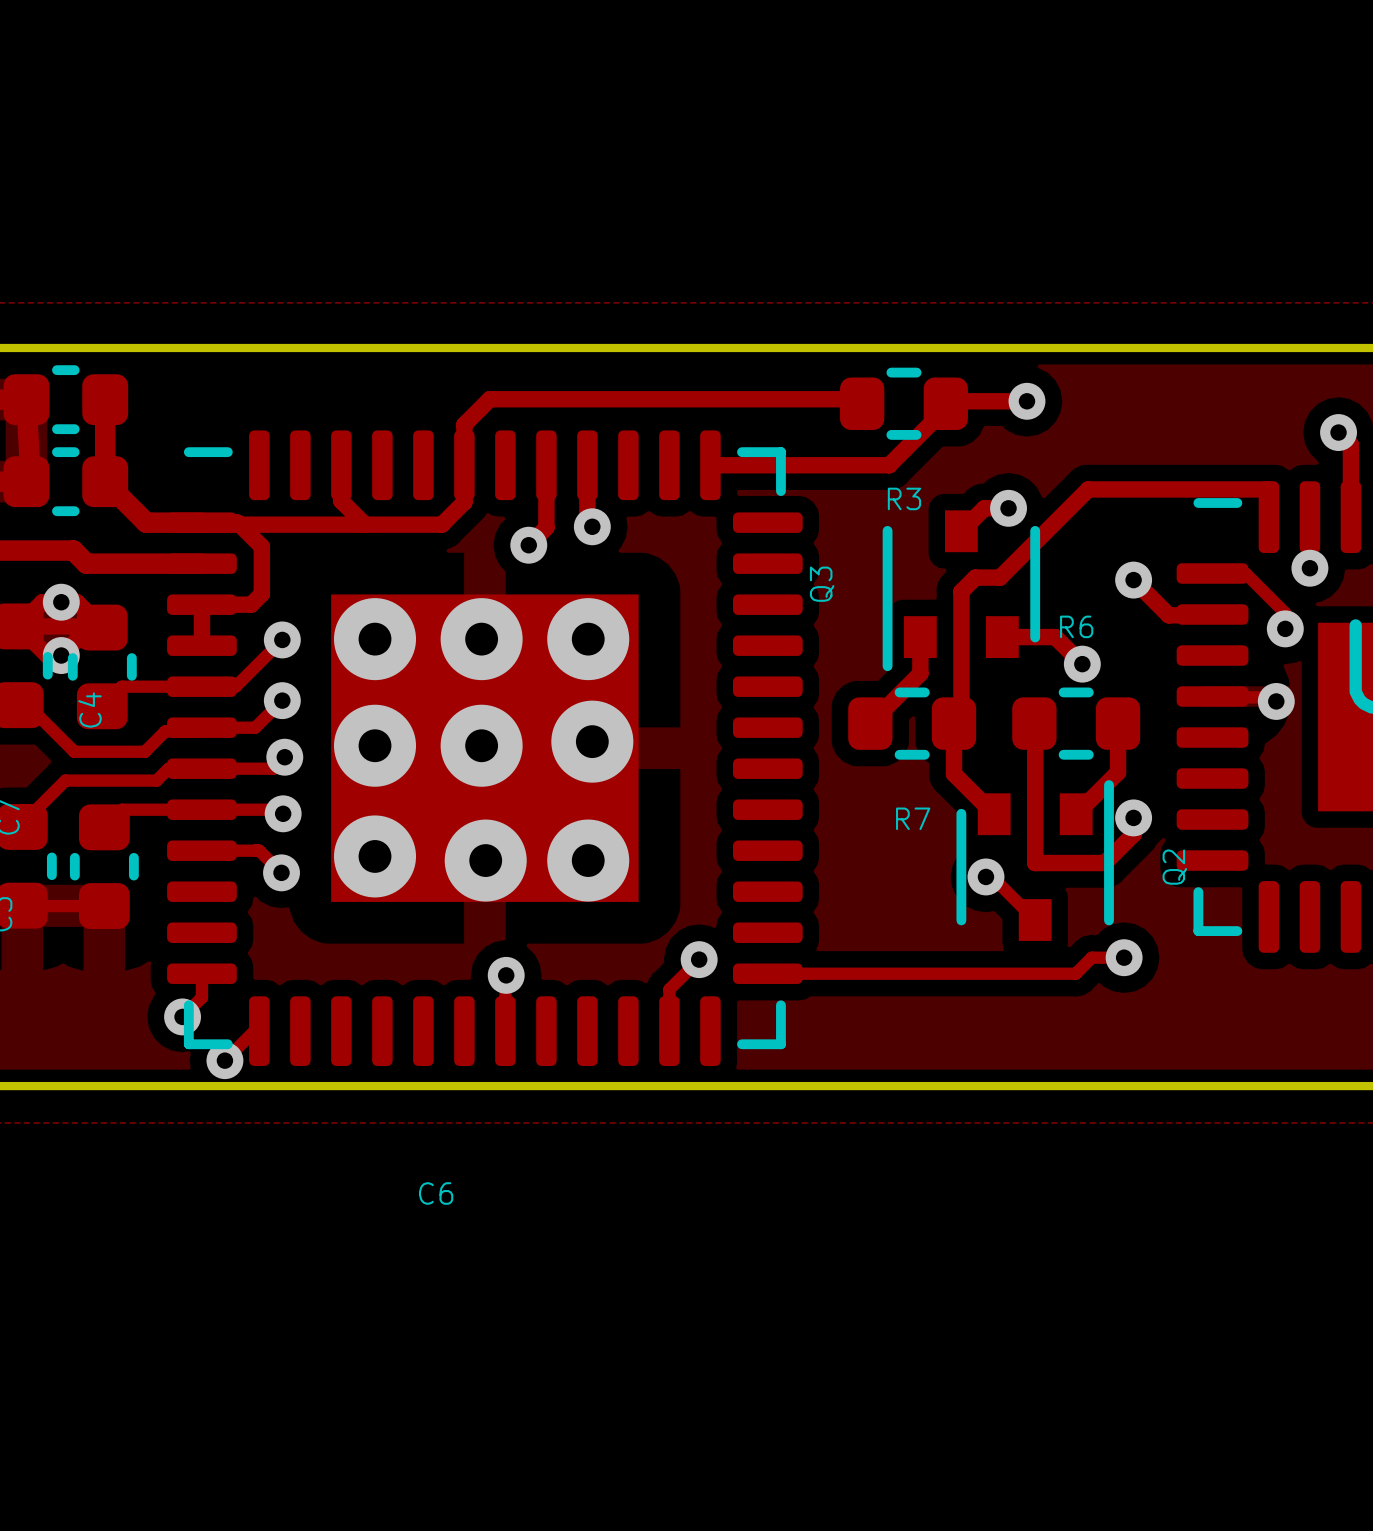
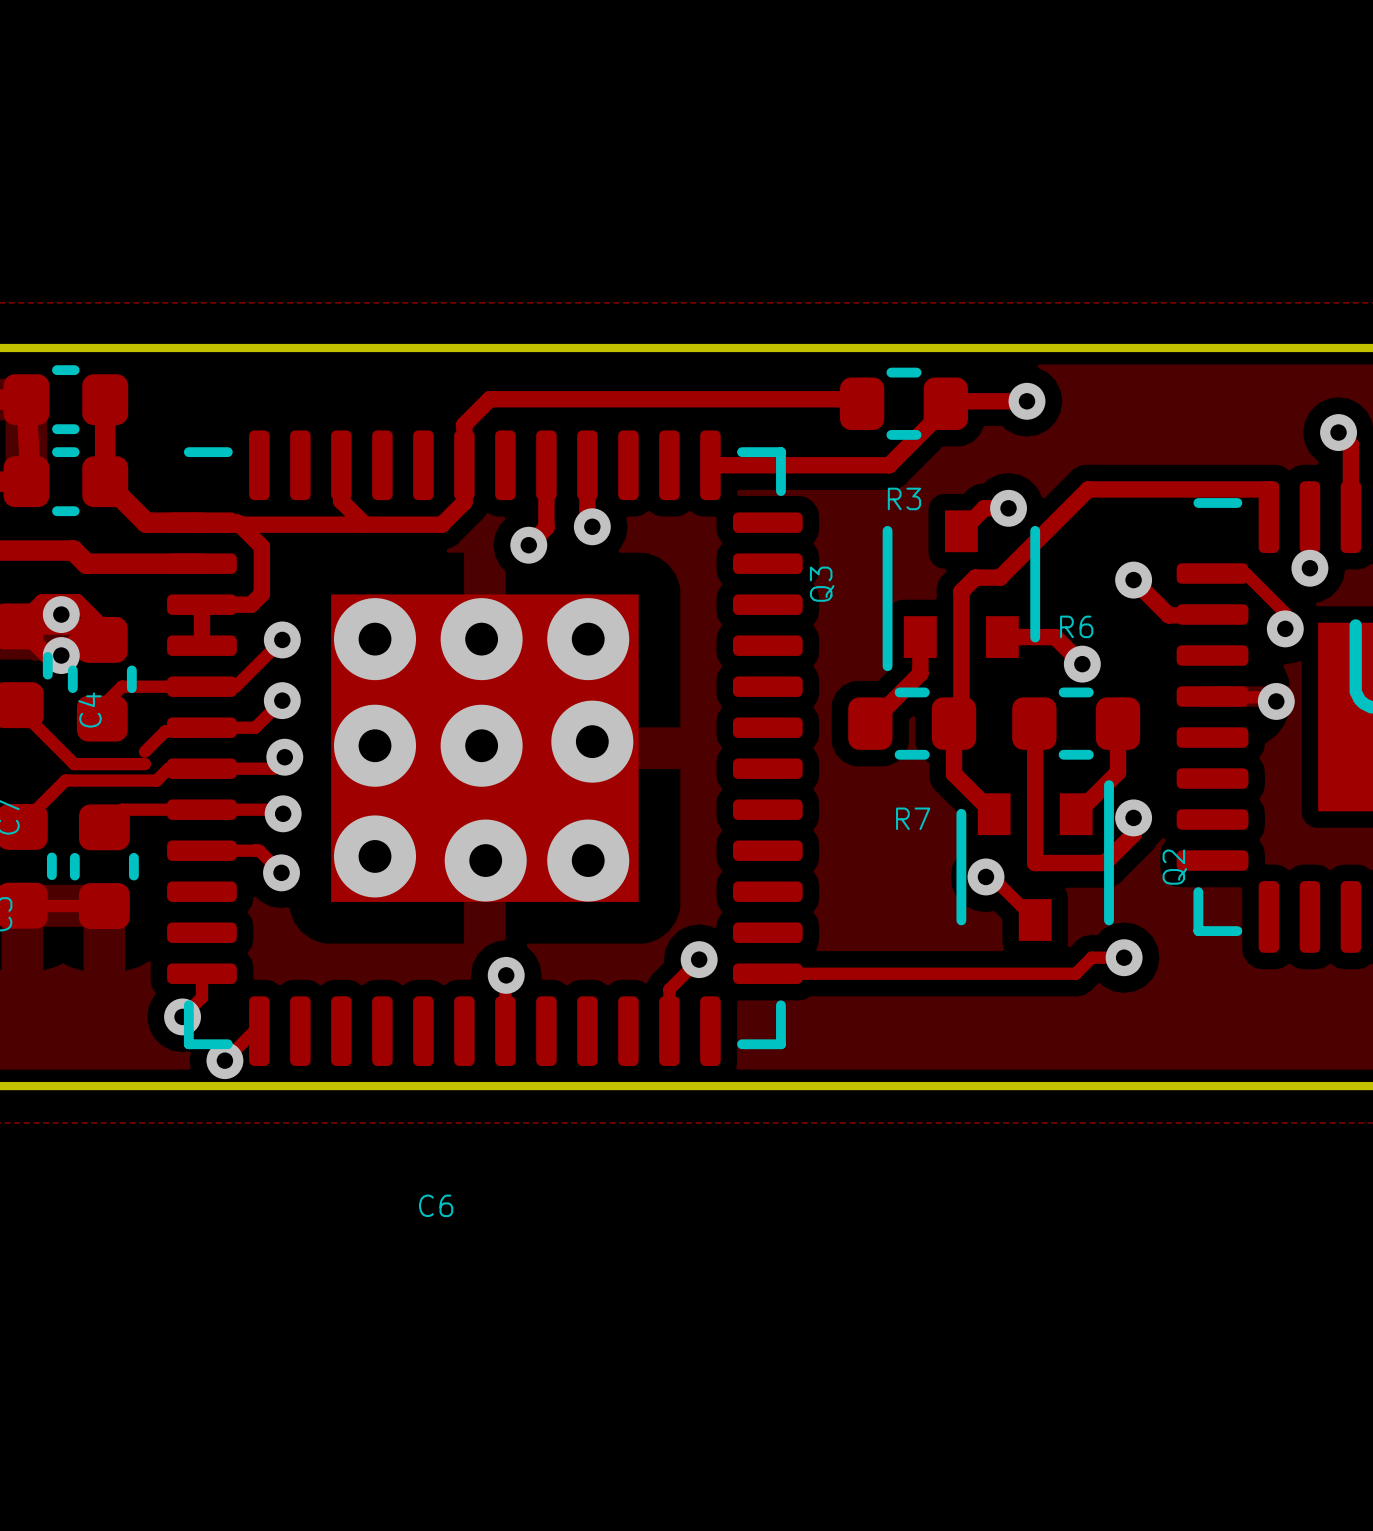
via position: (61, 602) -> (61, 614)
C6 position: (102, 666) -> (102, 679)
track: (18, 705) (27, 705) (74, 751) (144, 751) -> (18, 717) (27, 717) (74, 764) (144, 764)

